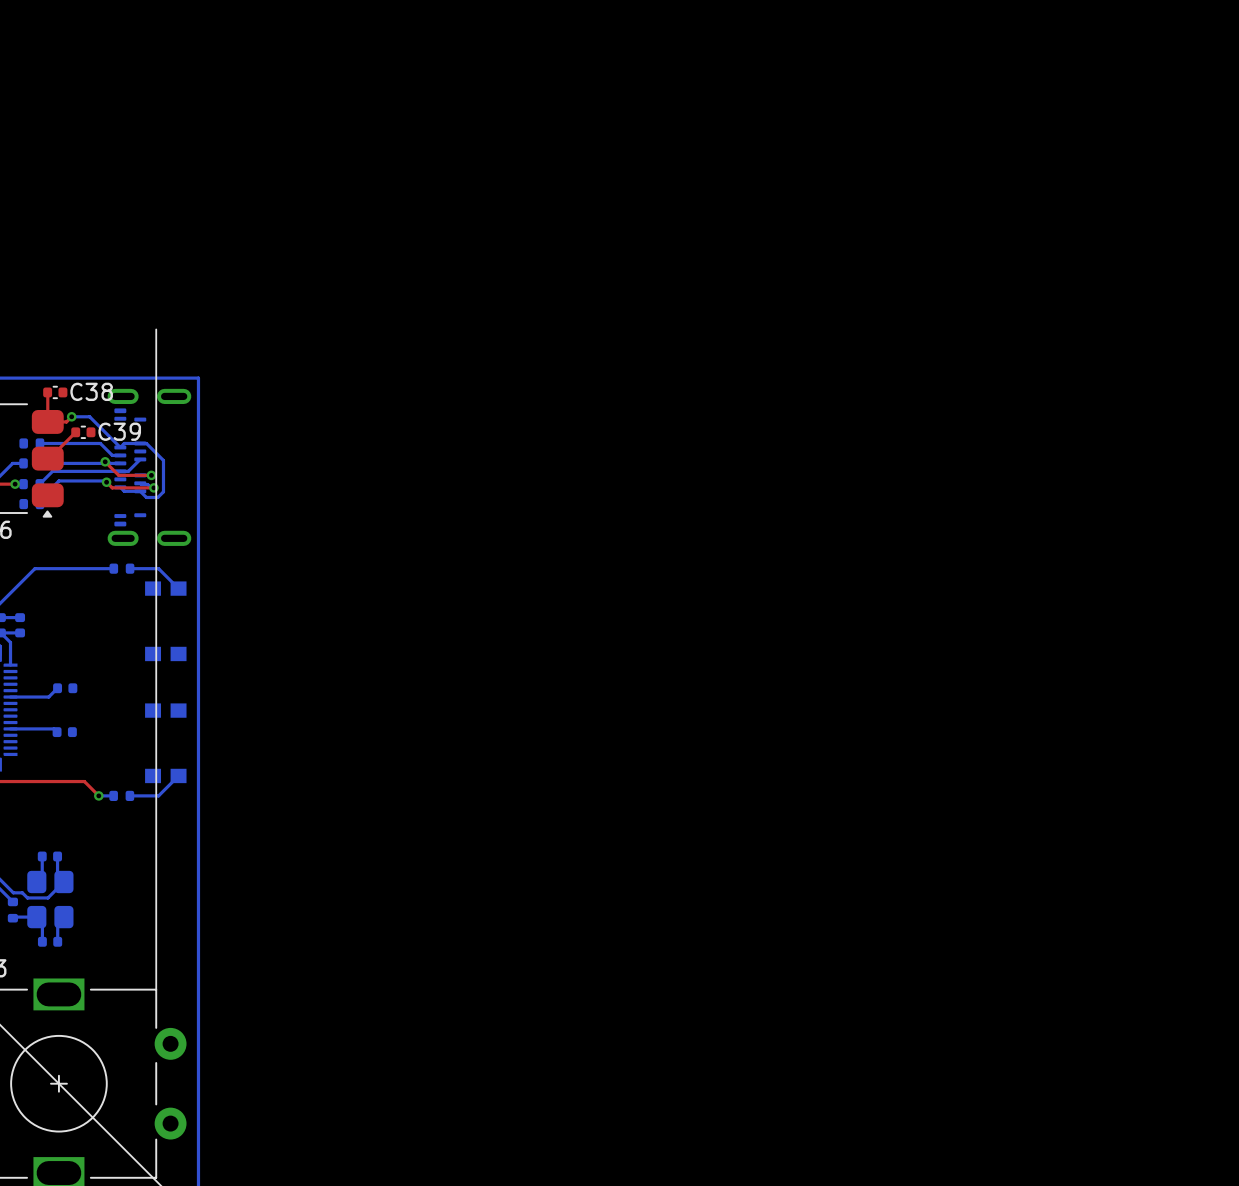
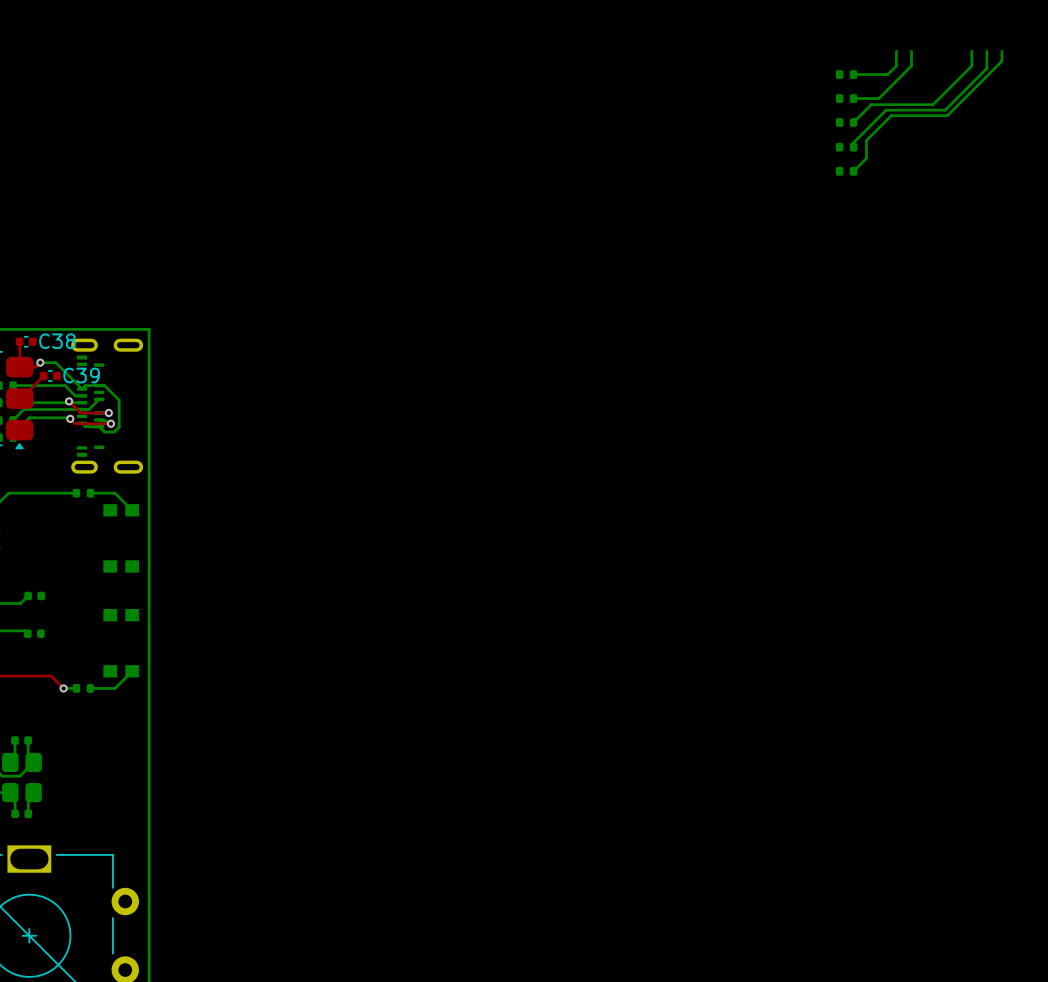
bottom track: none -> (896, 51) (896, 65) (887, 74) (853, 74)
bottom track: none -> (911, 51) (911, 65) (878, 98) (853, 98)
bottom track: none -> (971, 51) (971, 65) (933, 104) (871, 104) (853, 122)
bottom track: none -> (986, 51) (986, 68) (945, 110) (886, 110) (853, 142) (853, 147)
bottom track: none -> (1001, 51) (1001, 61) (947, 115) (891, 115) (866, 140) (866, 158) (853, 171)
part: none -> (846, 74)
part: none -> (846, 98)
part: none -> (846, 122)
part: none -> (846, 147)
part: none -> (846, 171)
line: (156, 329) (156, 989) -> none

